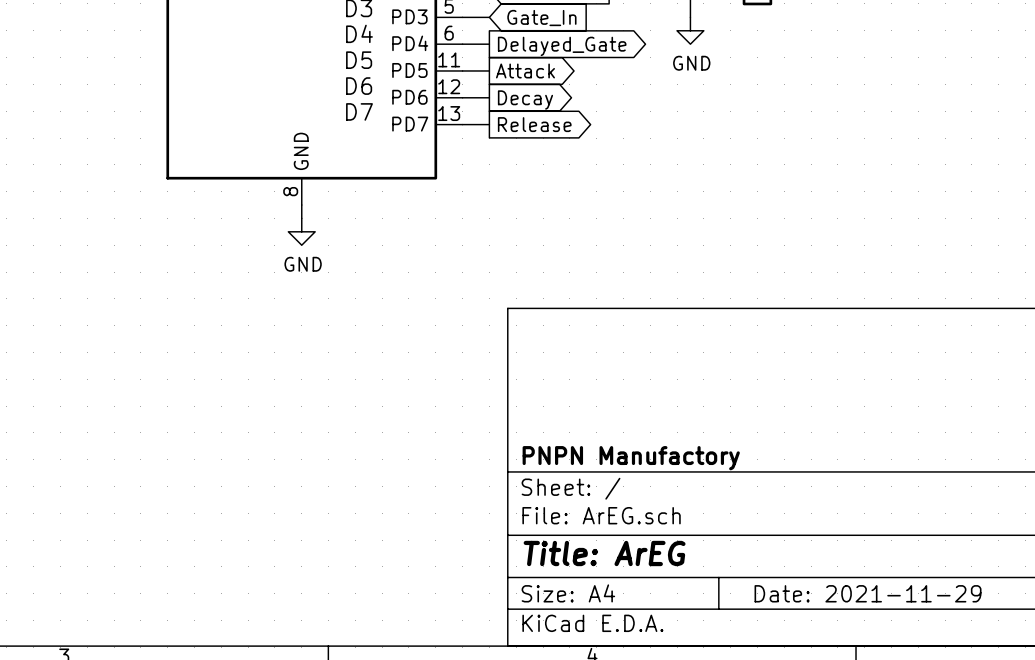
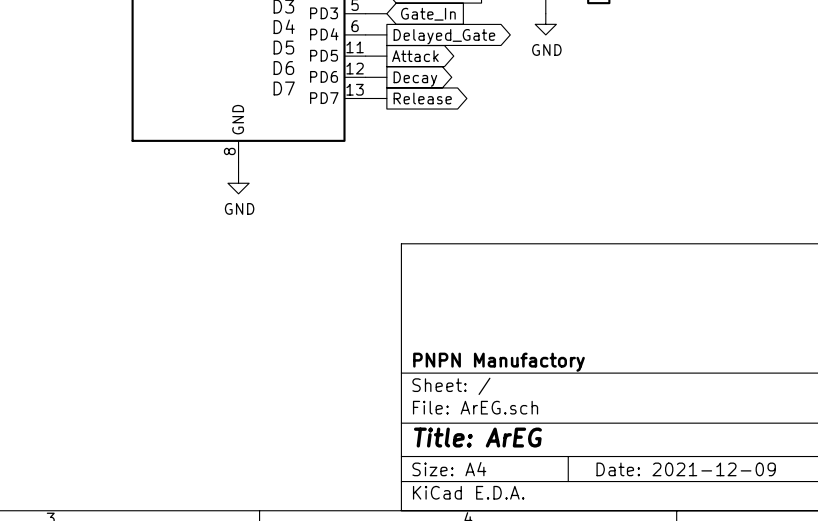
title block: Date: 2021-11-29 (868, 593) -> Date: 2021-12-09 (686, 469)

